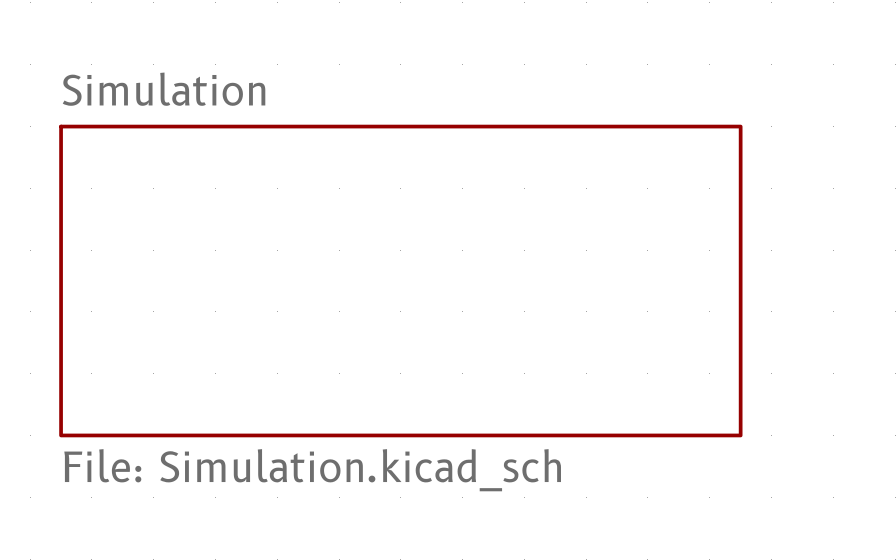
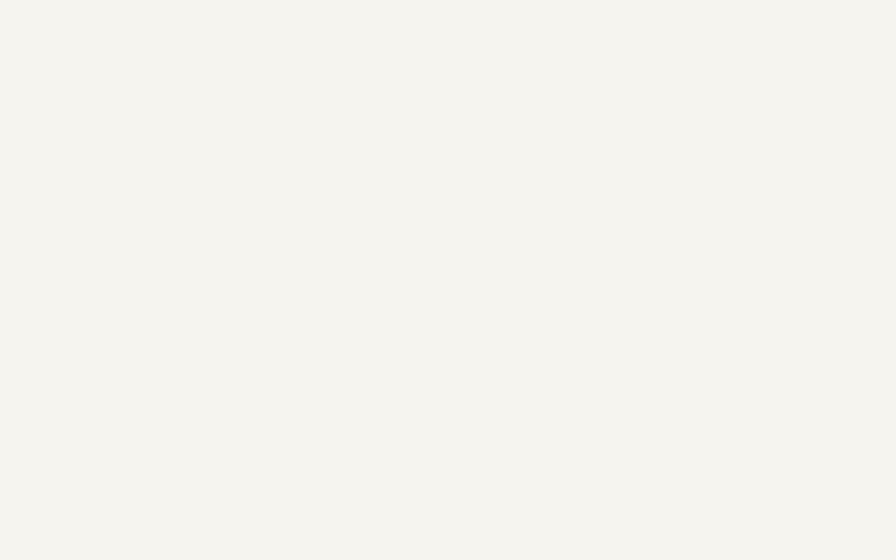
sheet Simulation: File: Simulation.kicad_sch (400, 281) -> none

